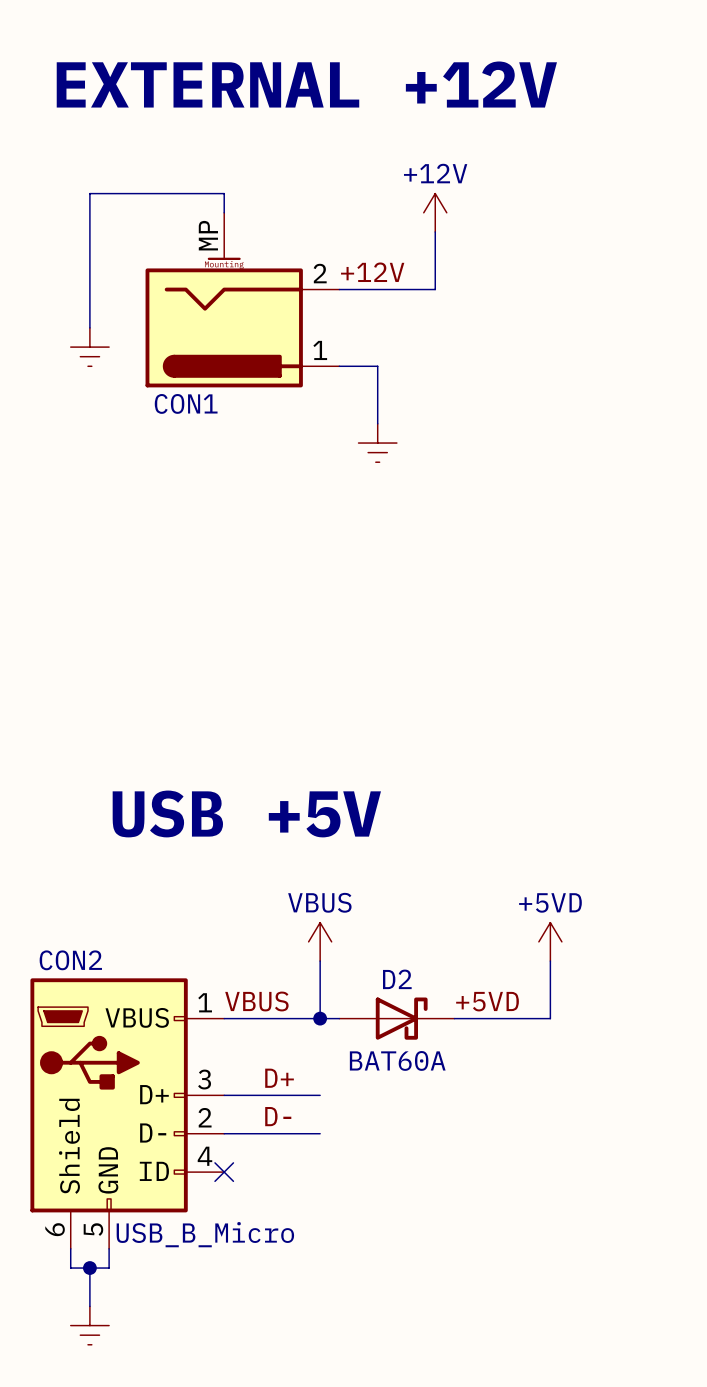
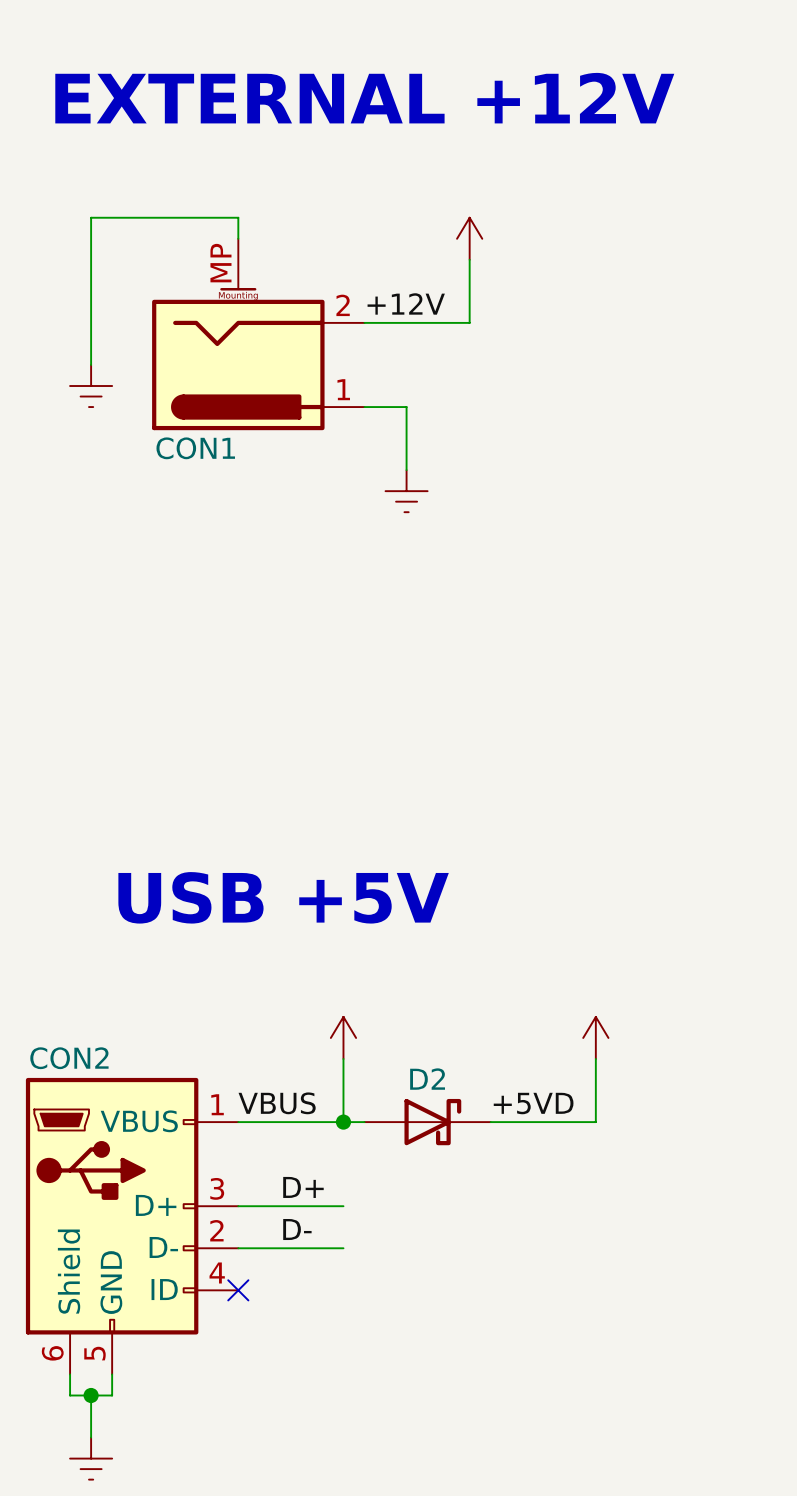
power symbol text: +12V (435, 173) -> none
power symbol text: VBUS (319, 902) -> none
power symbol text: +5VD (550, 902) -> none
D2 value: BAT60A (397, 1060) -> none
CON2 value: USB_B_Micro (205, 1234) -> none

